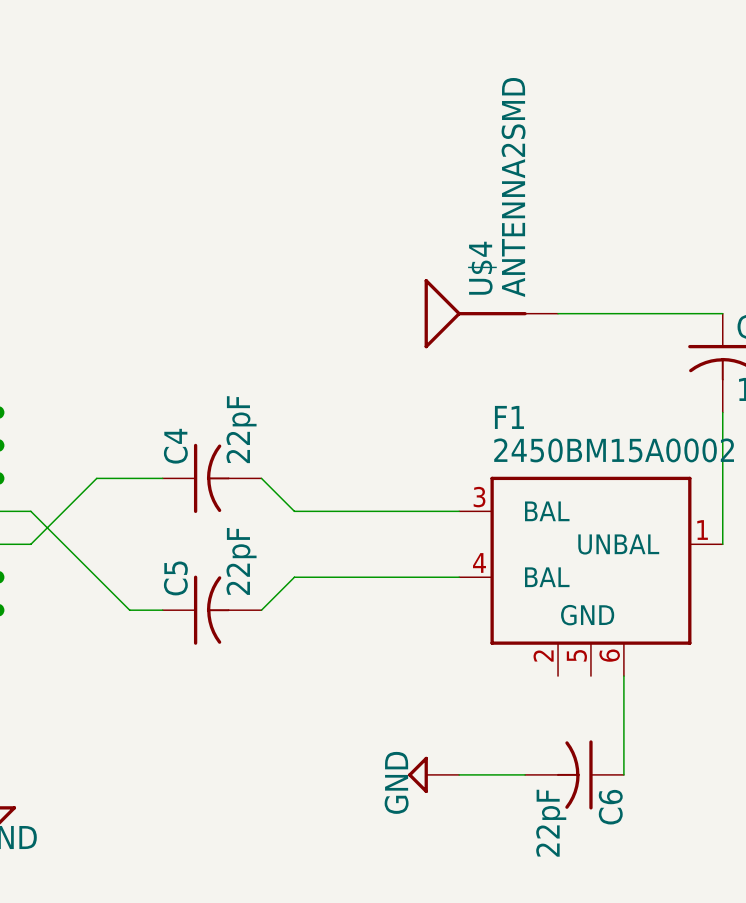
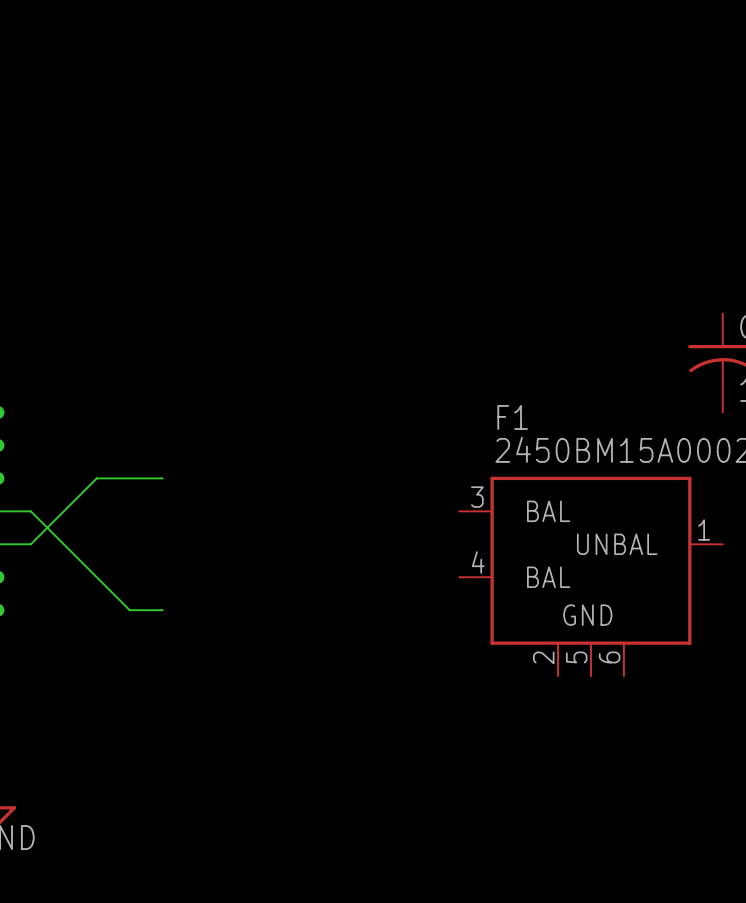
U$4: ANTENNA2SMD (491, 313) -> none
wire: (558, 313) (722, 313) -> none
wire: (722, 412) (722, 544) -> none
C4: 22pF (212, 478) -> none
wire: (261, 478) (294, 511) (459, 511) -> none
wire: (459, 577) (294, 577) (261, 610) -> none
C5: 22pF (212, 610) -> none
wire: (623, 676) (623, 774) -> none
power symbol: GND (433, 774) -> none
wire: (459, 774) (525, 774) -> none
C6: 22pF (574, 774) -> none

